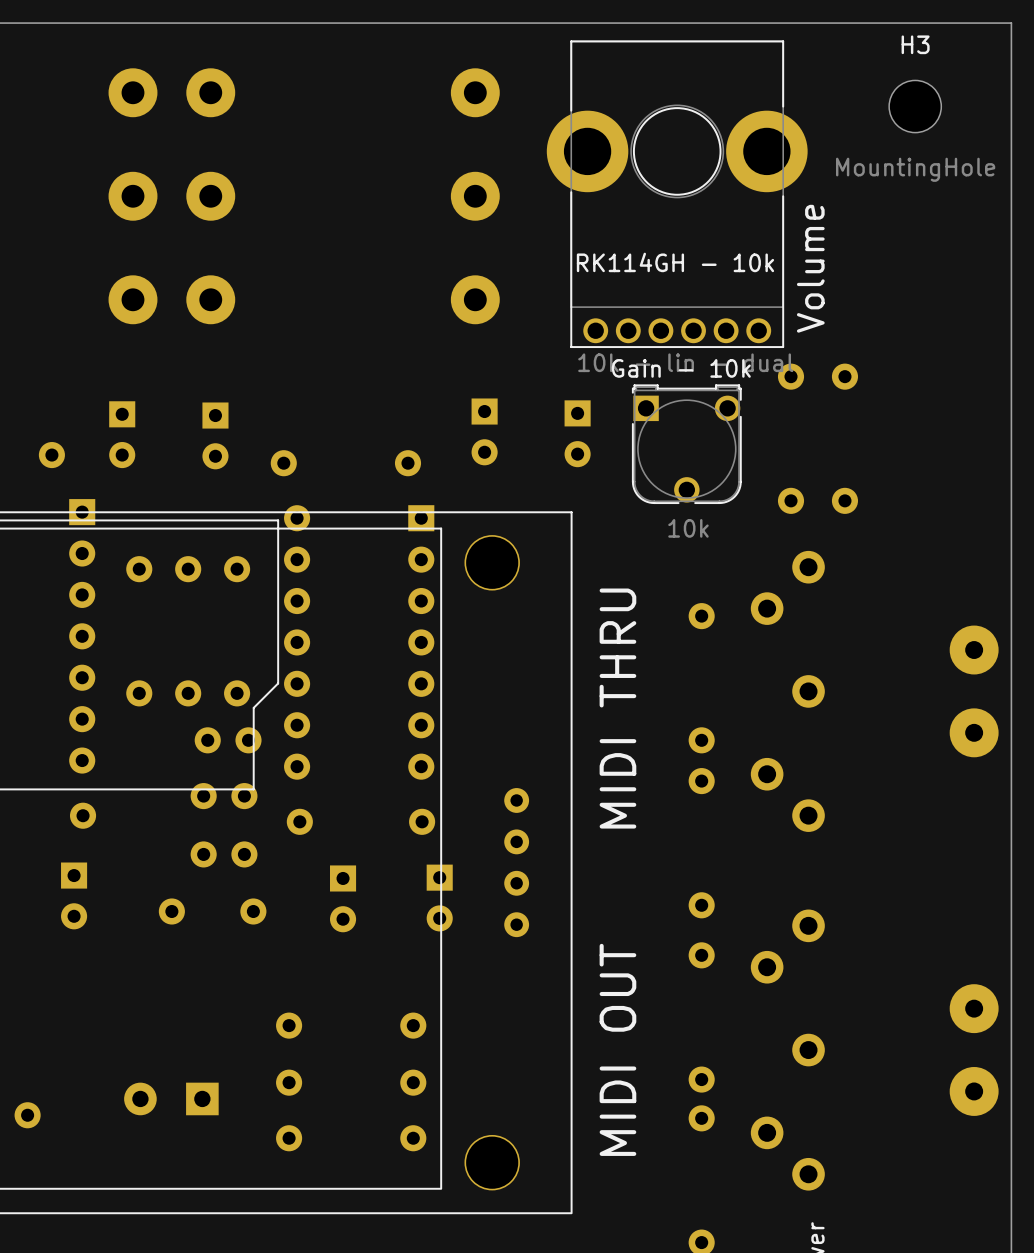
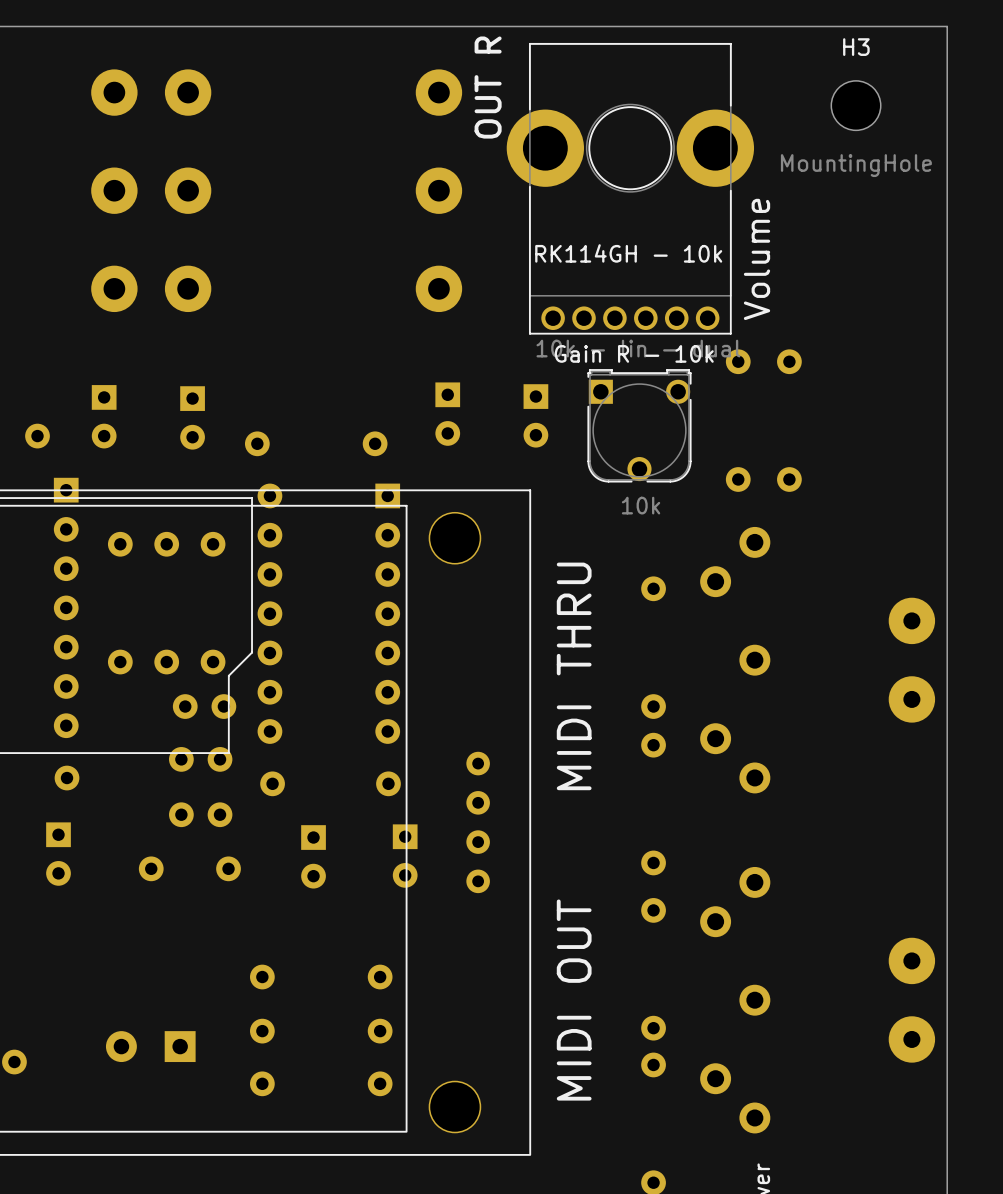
text: none -> OUT R (488, 87)
Gain - 10k name: Gain - 10k (681, 368) -> Gain R - 10k (634, 353)

